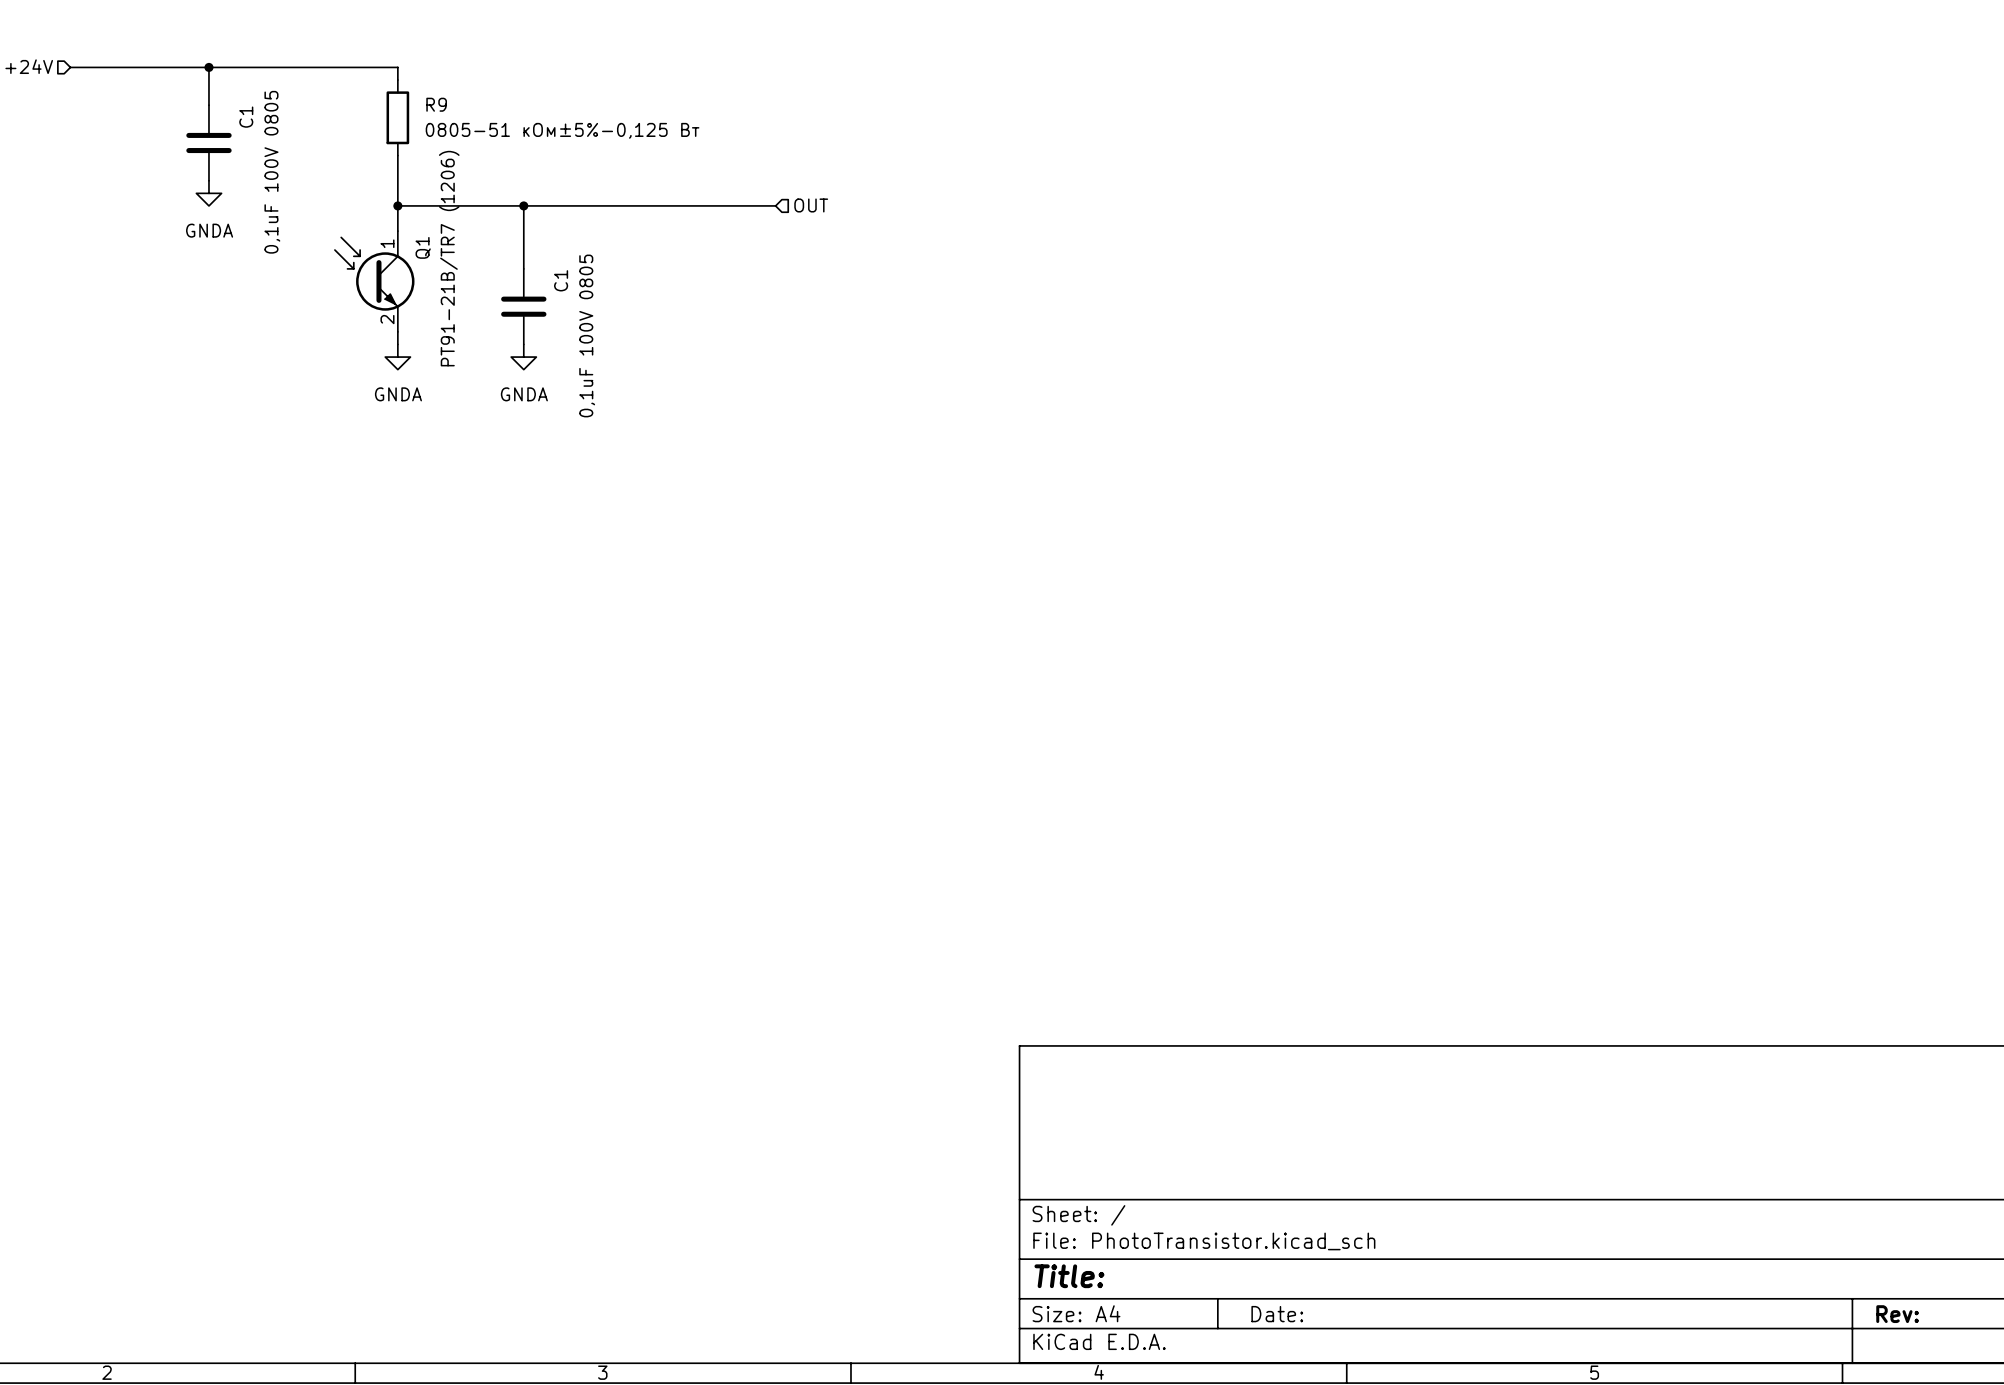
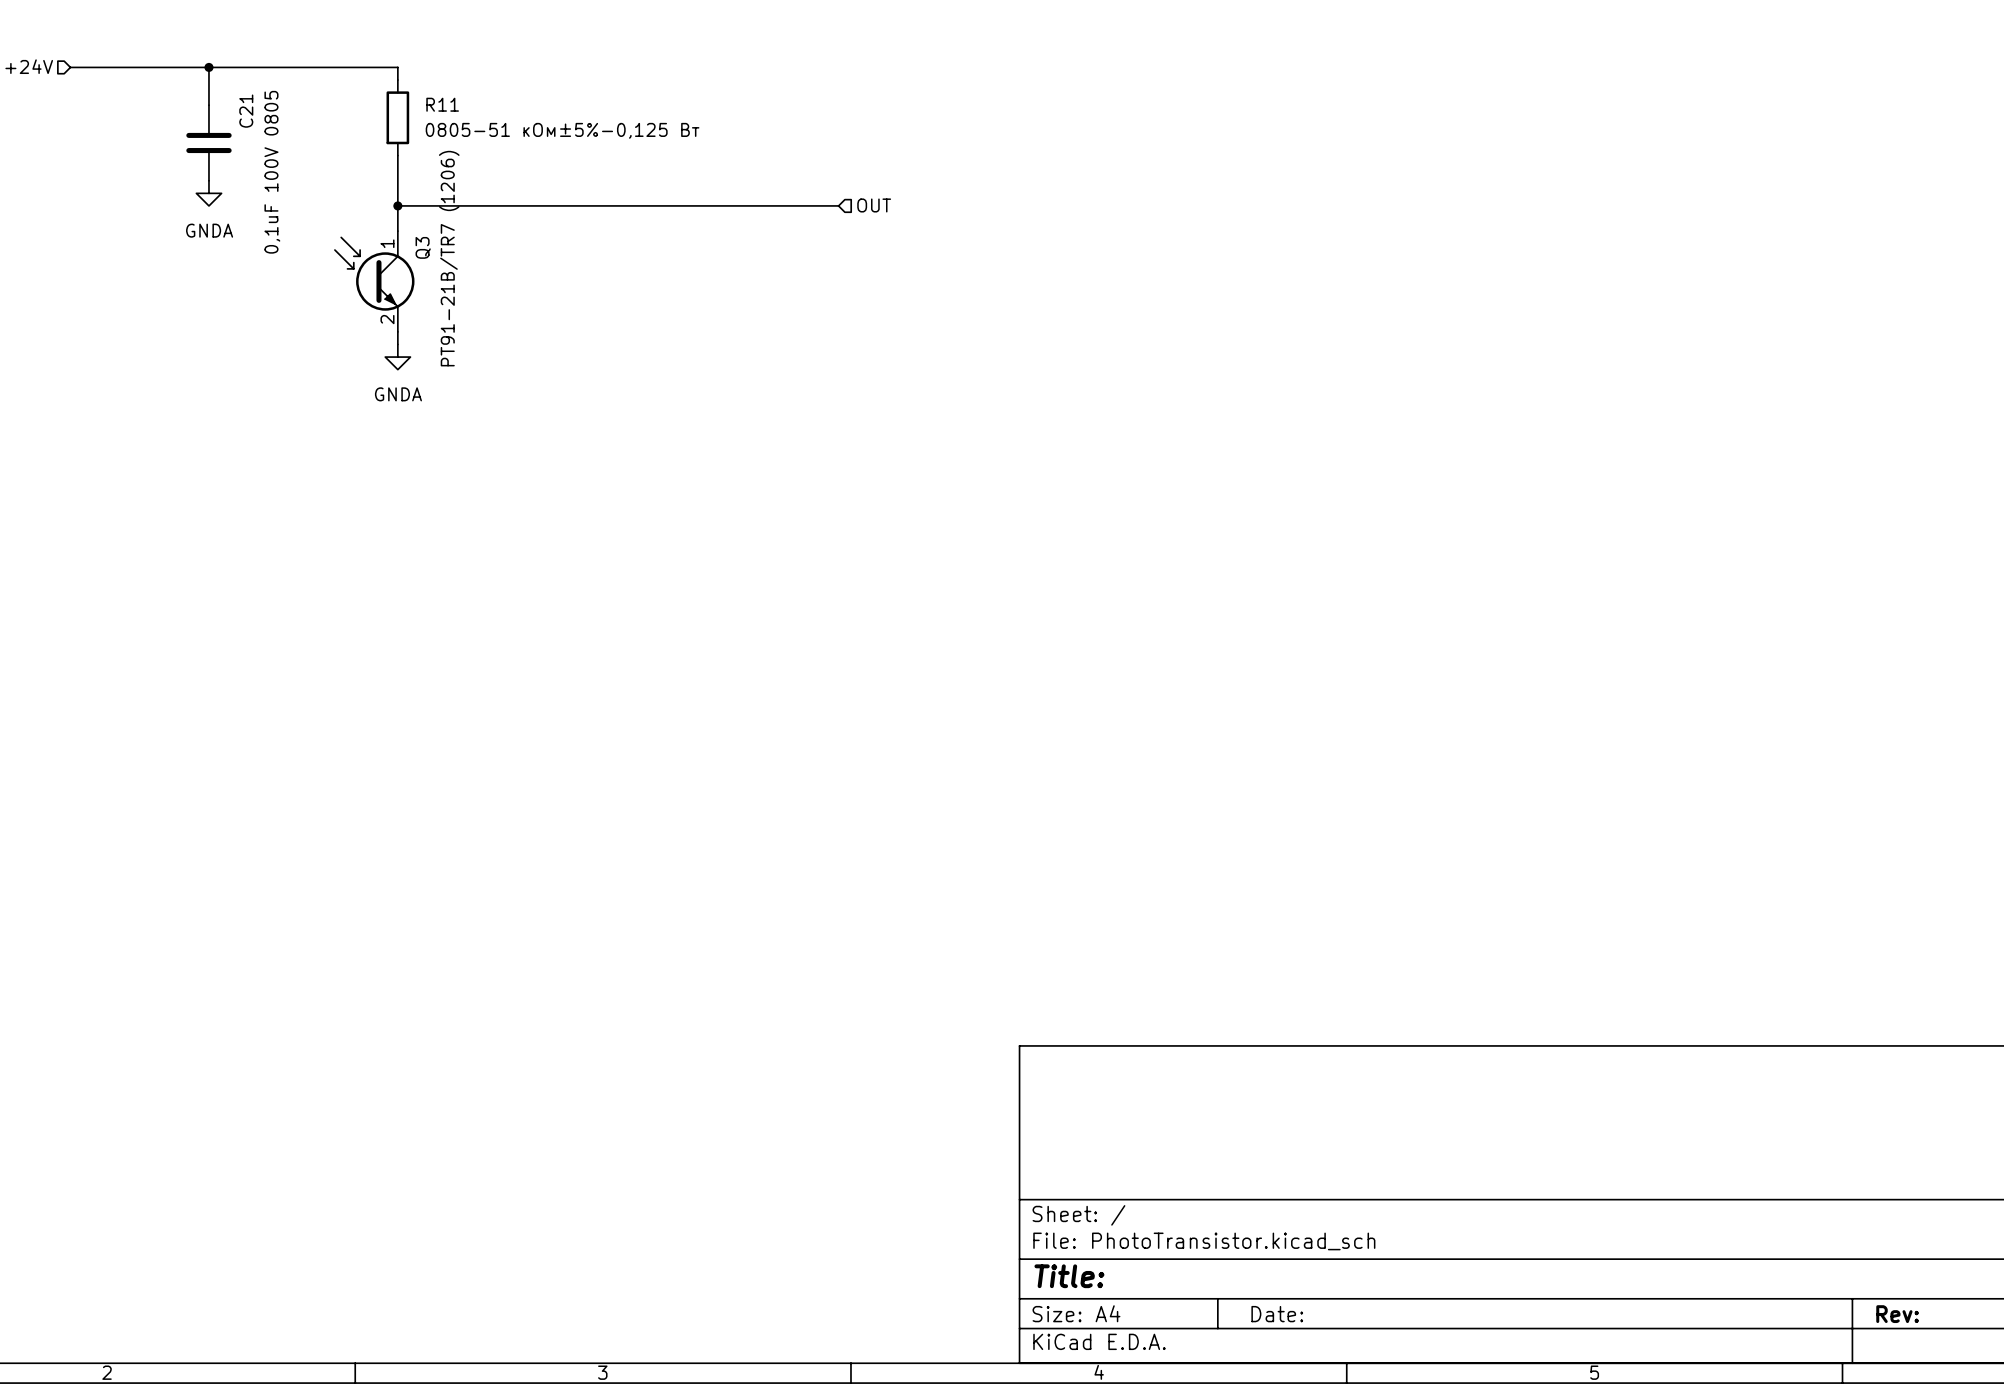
R9 name: R9 (436, 104) -> R11 (442, 104)
C1 name: C1 (246, 117) -> C21 (246, 111)
wire: (523, 205) (523, 268) -> none
junction: (523, 205) -> none
wire: none -> (775, 205) (838, 205)
hierarchical label position: OUT (811, 205) -> OUT (874, 205)
Q1 name: Q1 (423, 247) -> Q3 (423, 247)
C1: 0,1uF 100V 0805 (523, 306) -> none
power symbol: GNDA (523, 357) -> none

